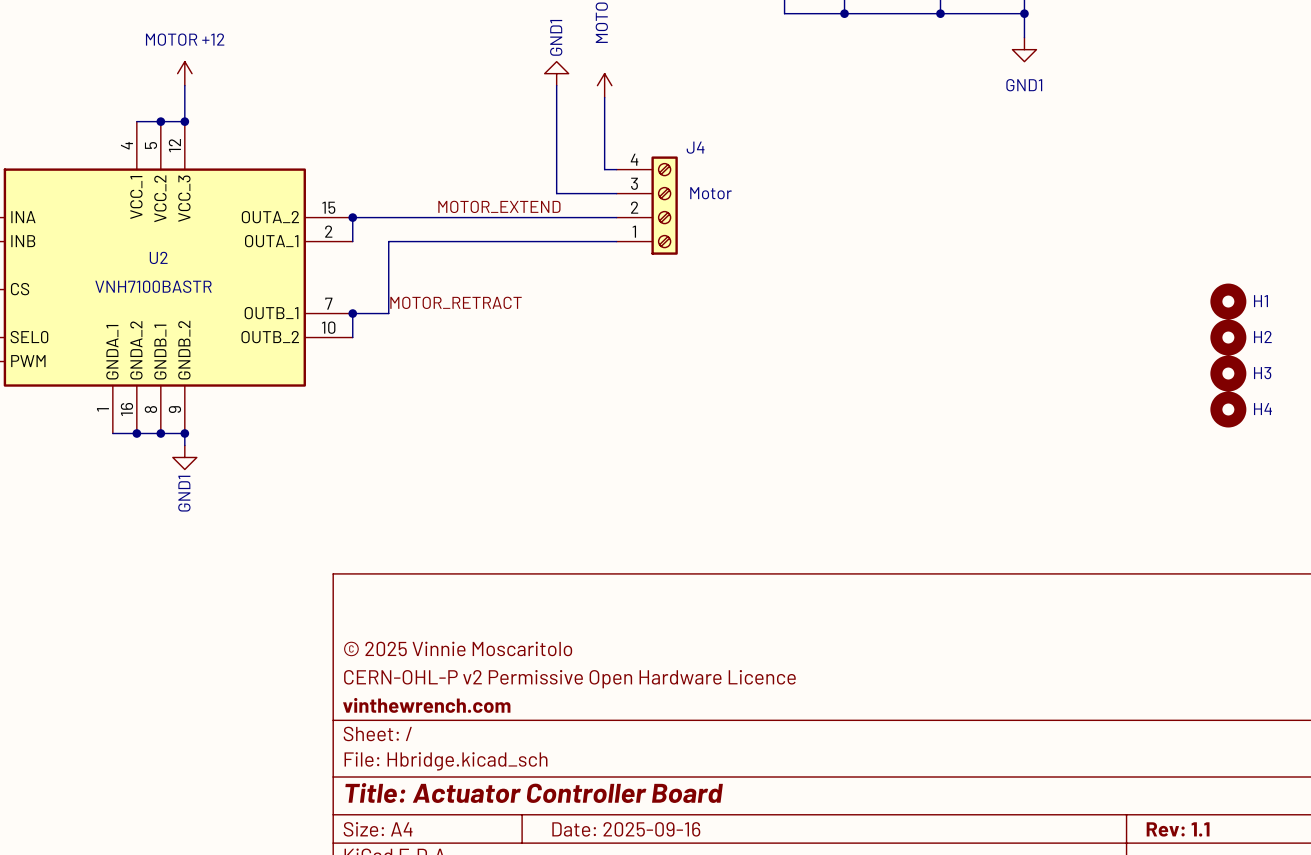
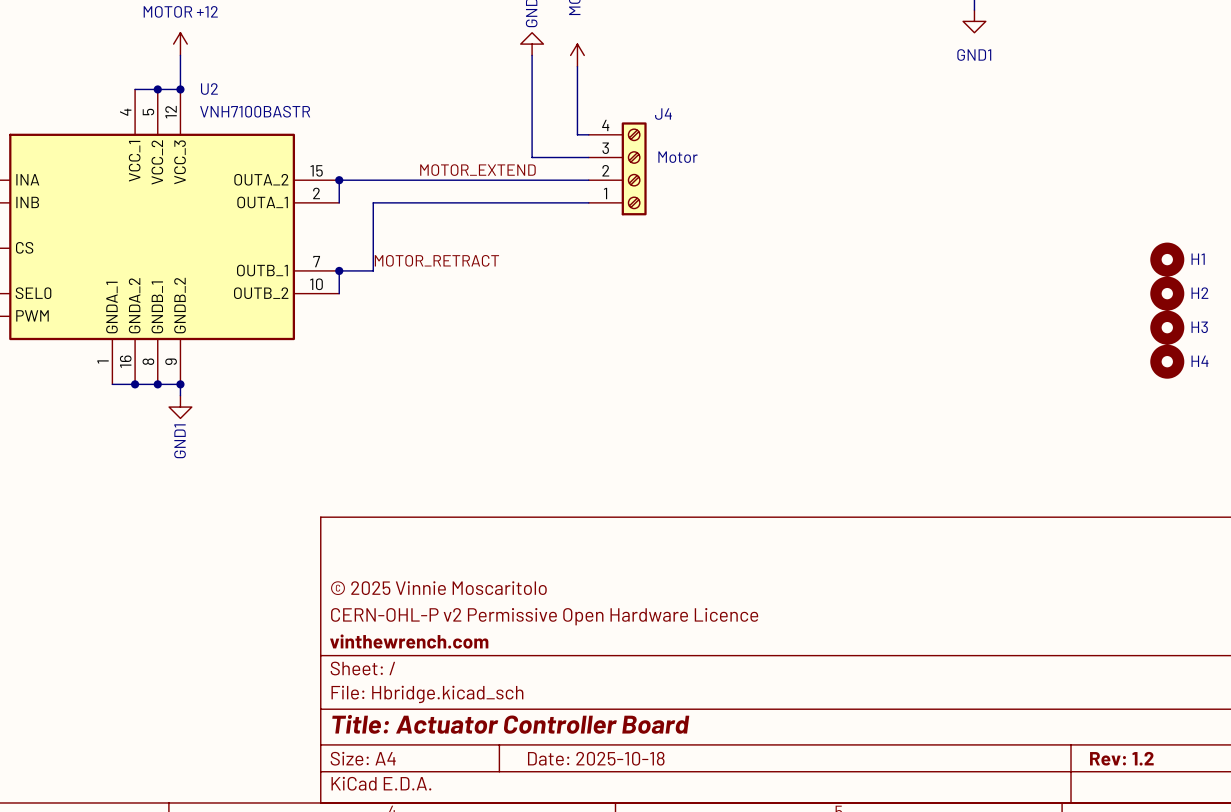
U2 name position: U2 (158, 257) -> U2 (209, 89)
U2 value position: VNH7100BASTR (153, 286) -> VNH7100BASTR (255, 111)
title block: Date: 2025-09-16 (626, 829) -> Date: 2025-10-18 (596, 758)
title block: Rev: 1.1 (1178, 829) -> Rev: 1.2 (1121, 758)

